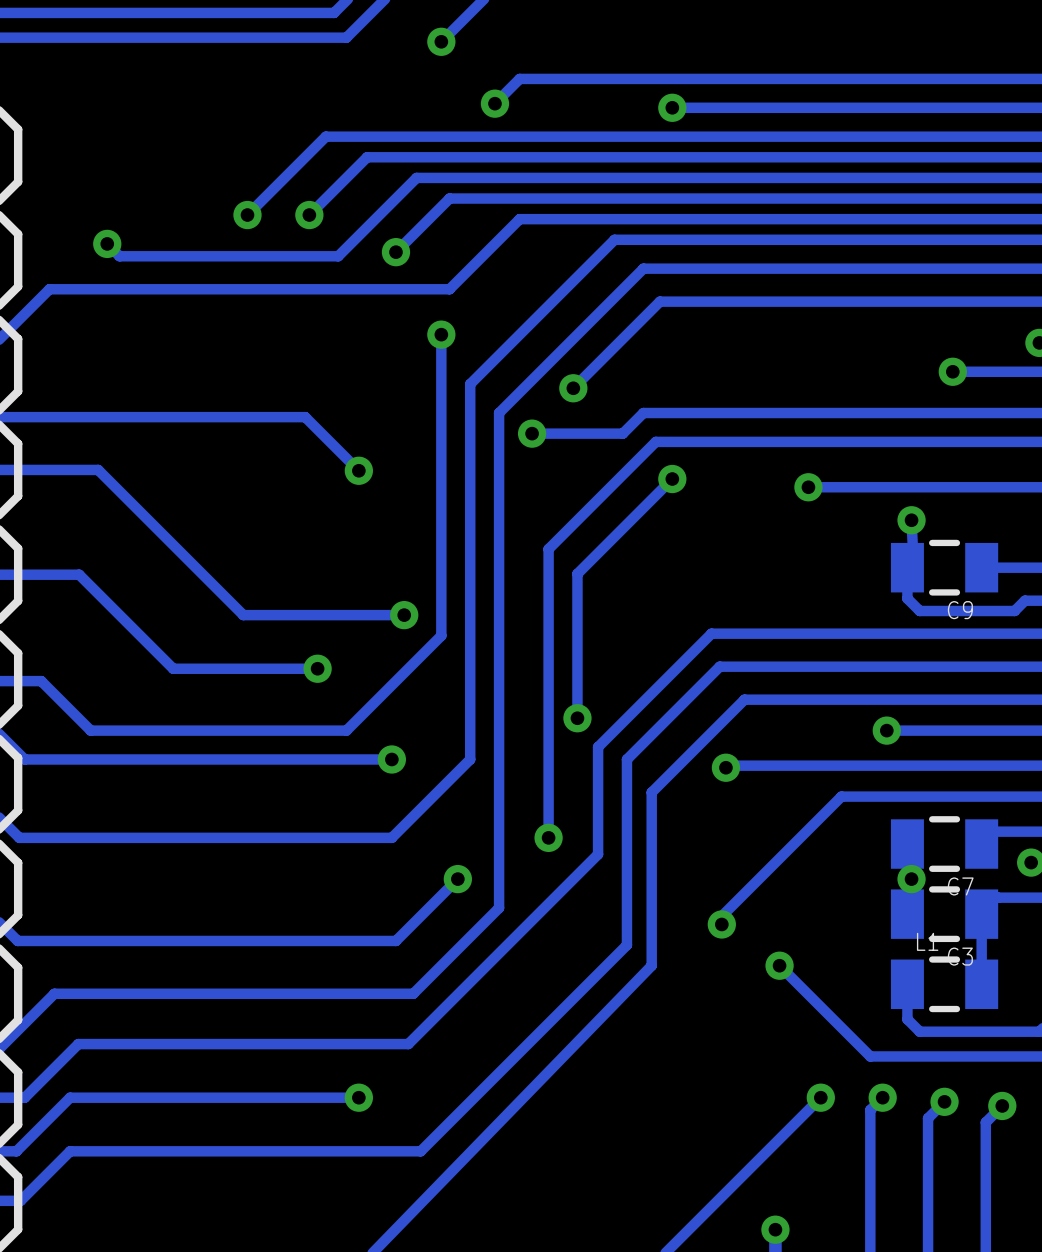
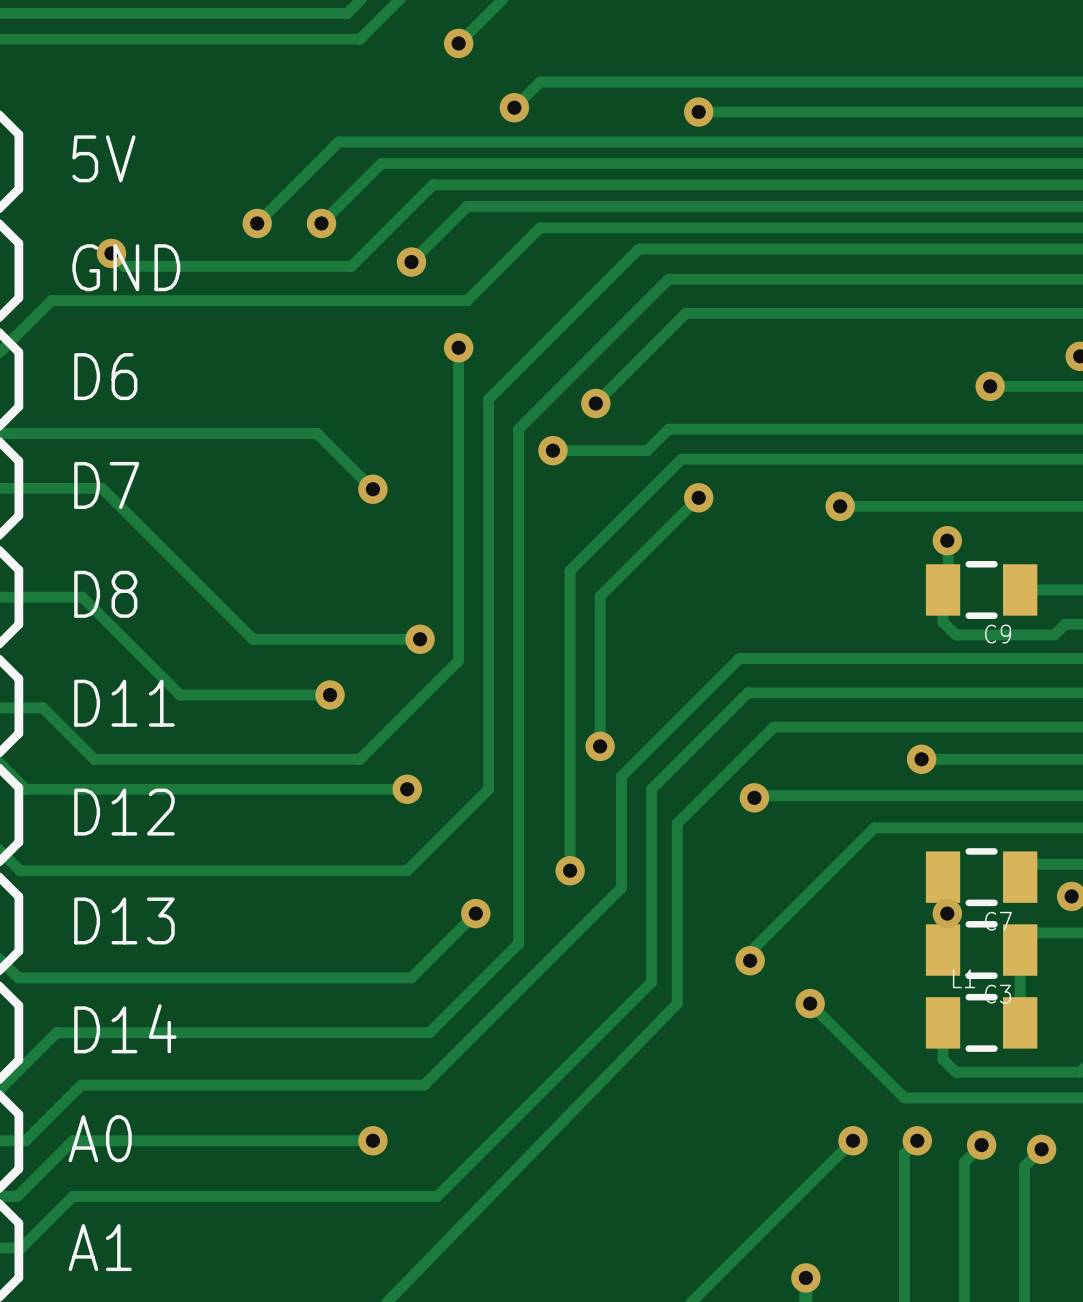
text: none -> 5V (103, 158)
text: none -> GND (126, 267)
text: none -> D6 (105, 376)
text: none -> D7 (106, 485)
text: none -> D8 (105, 594)
text: none -> D11 (124, 703)
text: none -> D12 (124, 812)
text: none -> D13 (124, 920)
text: none -> D14 (125, 1028)
text: none -> A0 (100, 1138)
text: none -> A1 (100, 1247)

